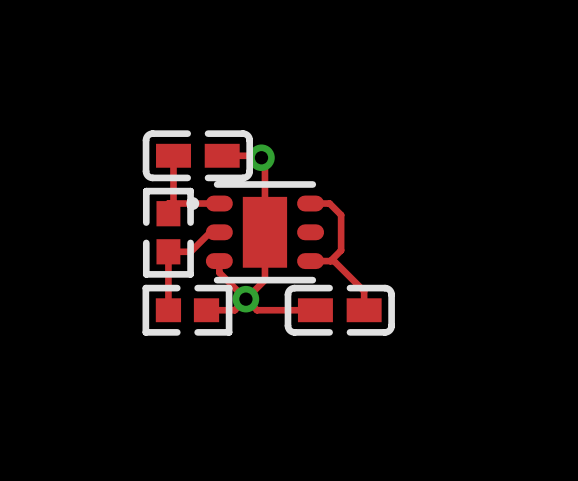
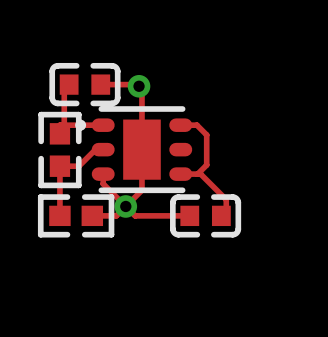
part footprint: [142, 130, 253, 182] -> [49, 62, 121, 107]
part footprint: [284, 284, 395, 336] -> [170, 194, 242, 238]

